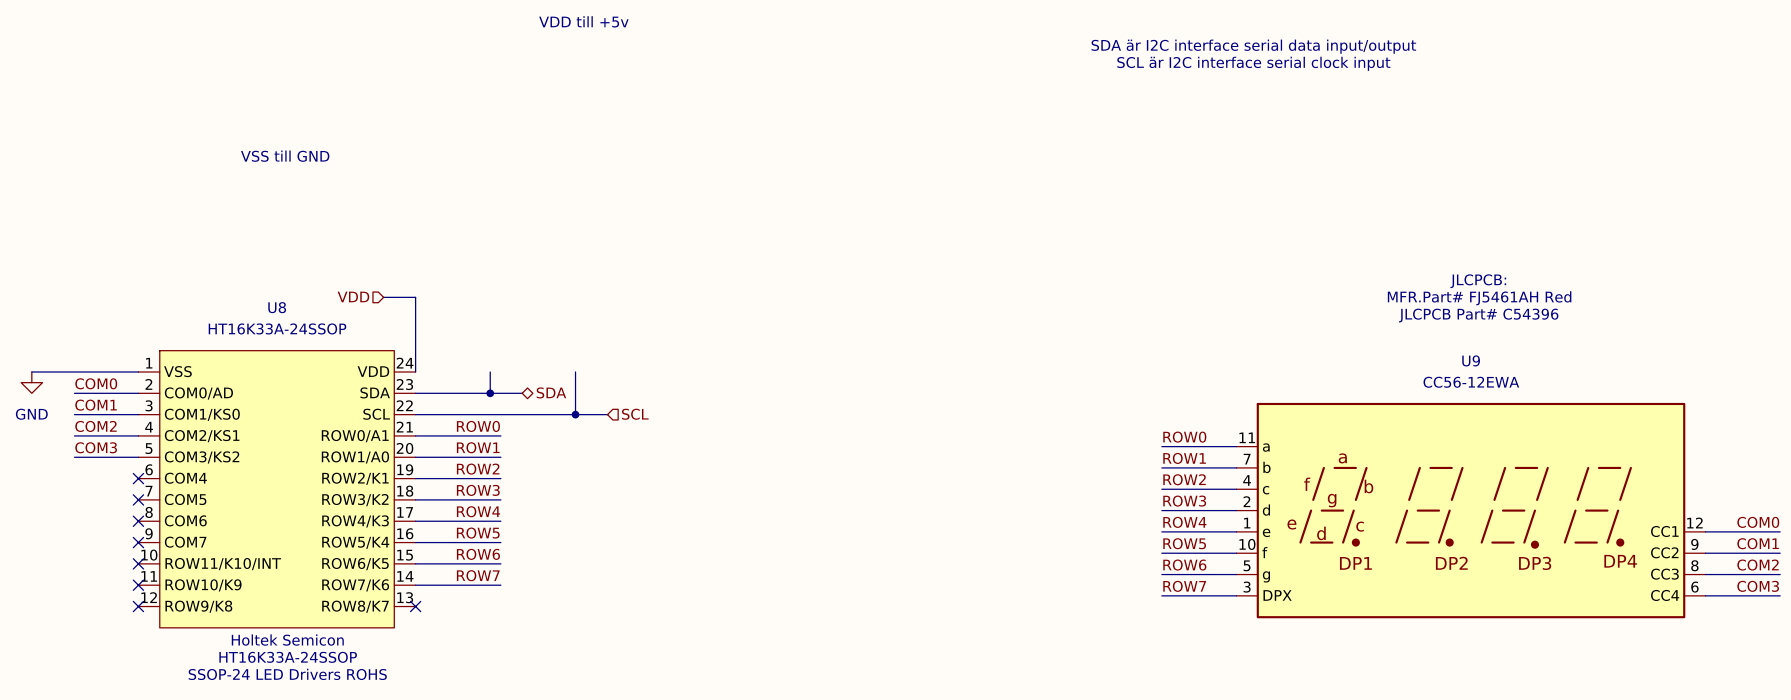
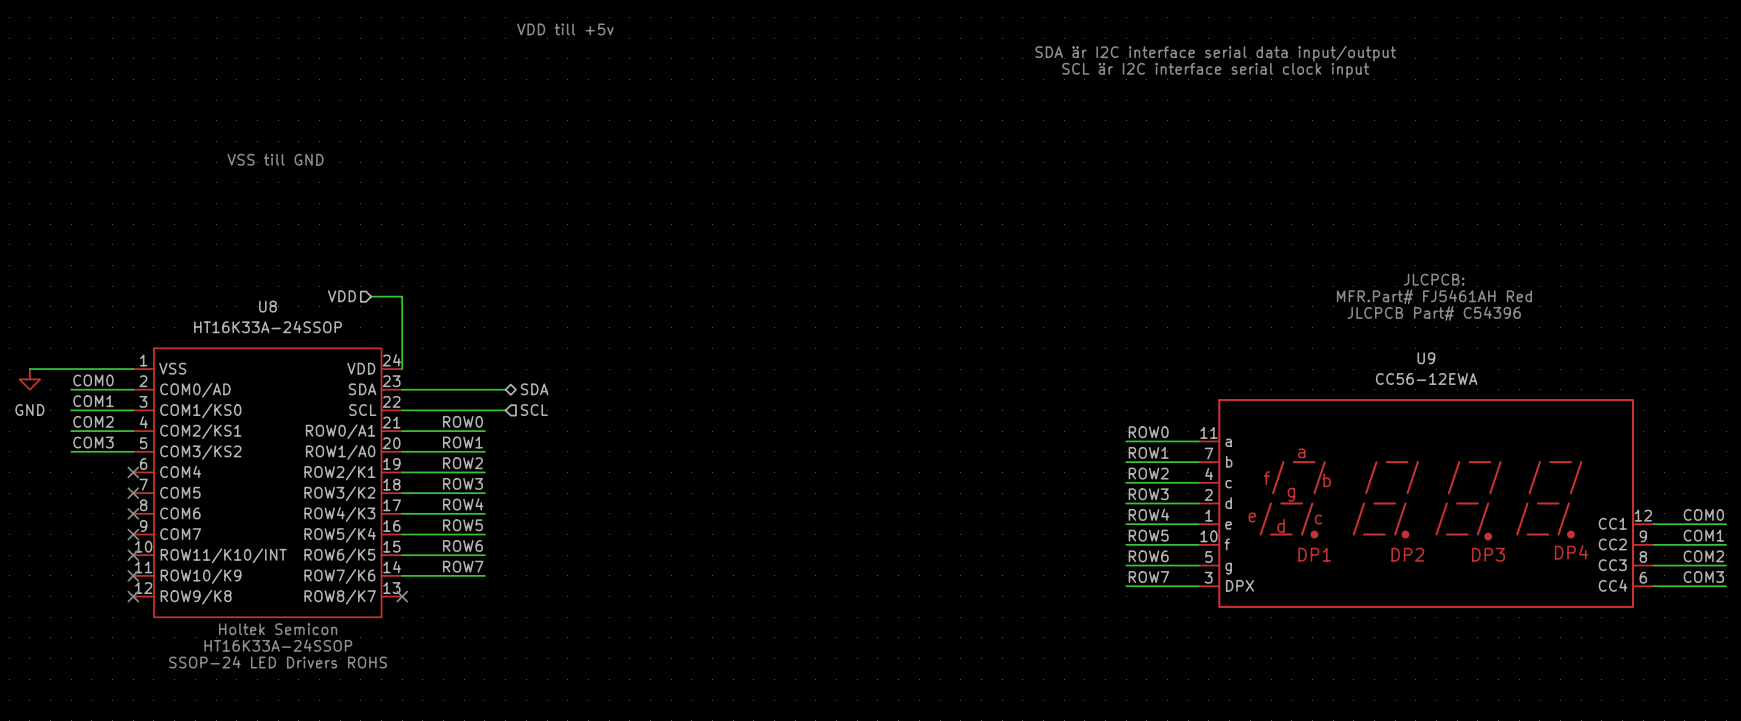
wire: (490, 371) (490, 393) -> none
wire: (575, 371) (575, 414) -> none
junction: (490, 393) -> none
wire: (522, 414) (607, 414) -> none
junction: (575, 414) -> none
hierarchical label position: SCL (635, 414) -> SCL (534, 410)

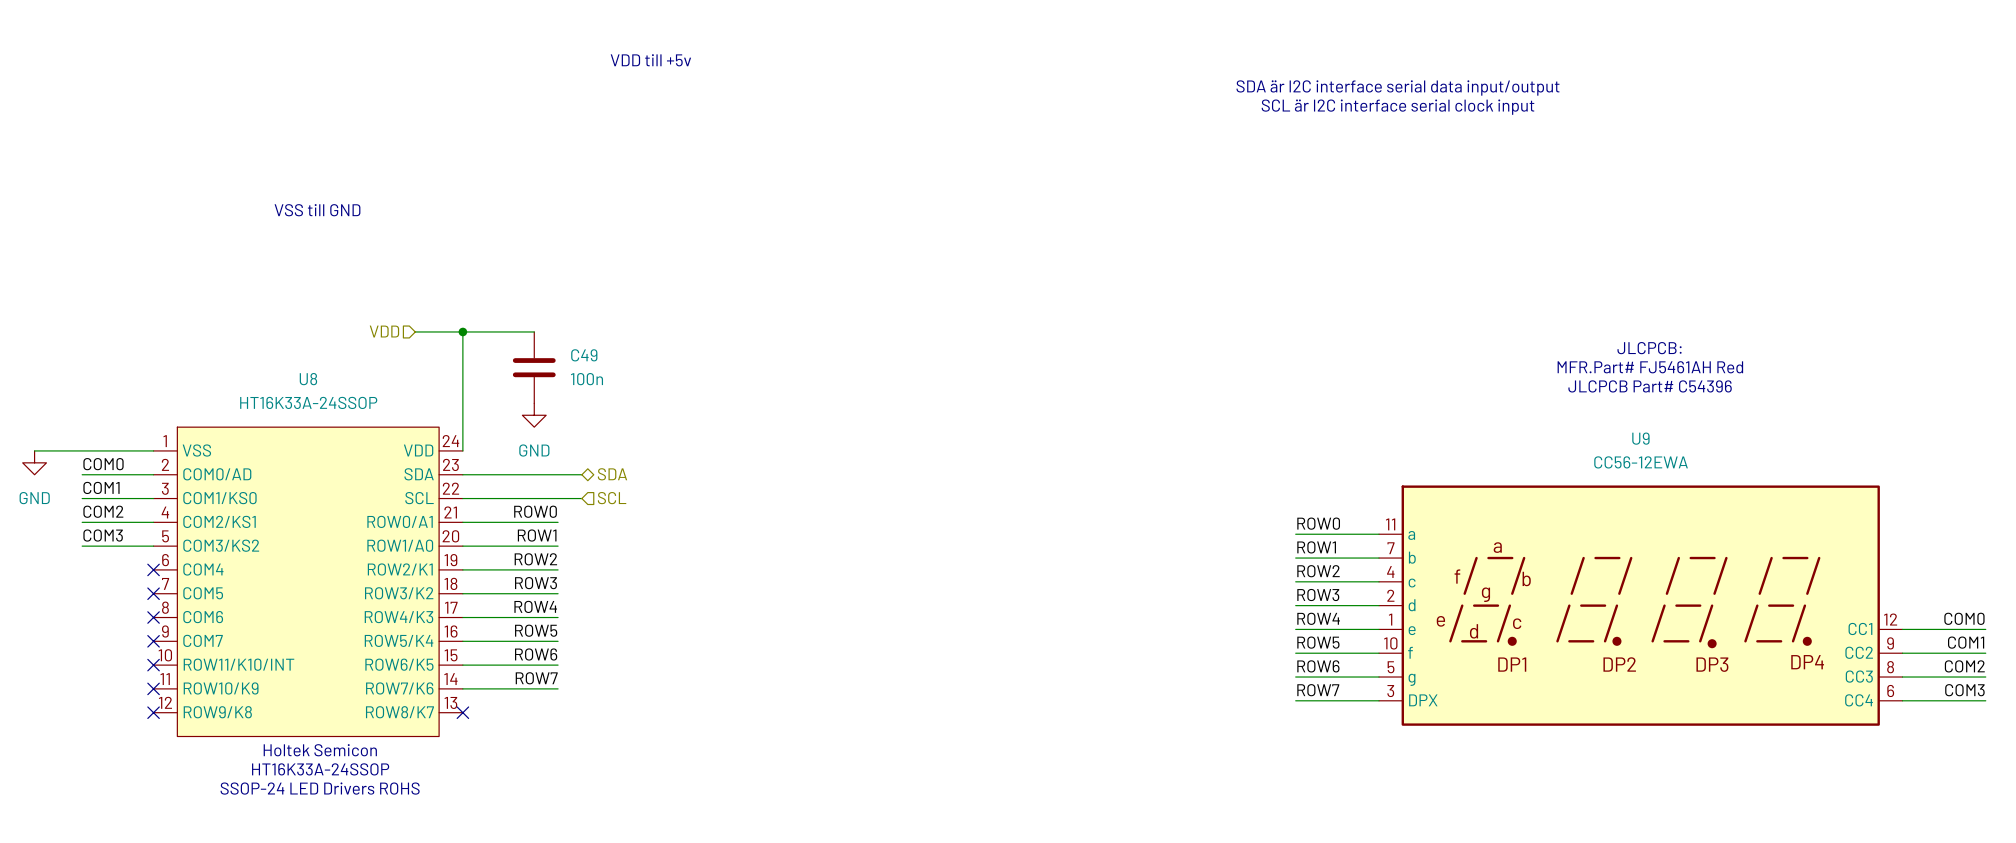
wire: none -> (415, 331) (534, 331)
junction: none -> (462, 331)
hierarchical label position: VDD (341, 296) -> VDD (384, 331)
wire: (371, 296) (402, 296) -> (462, 331) (462, 367)
C49: none -> 100n (534, 367)
power symbol: none -> GND (534, 415)

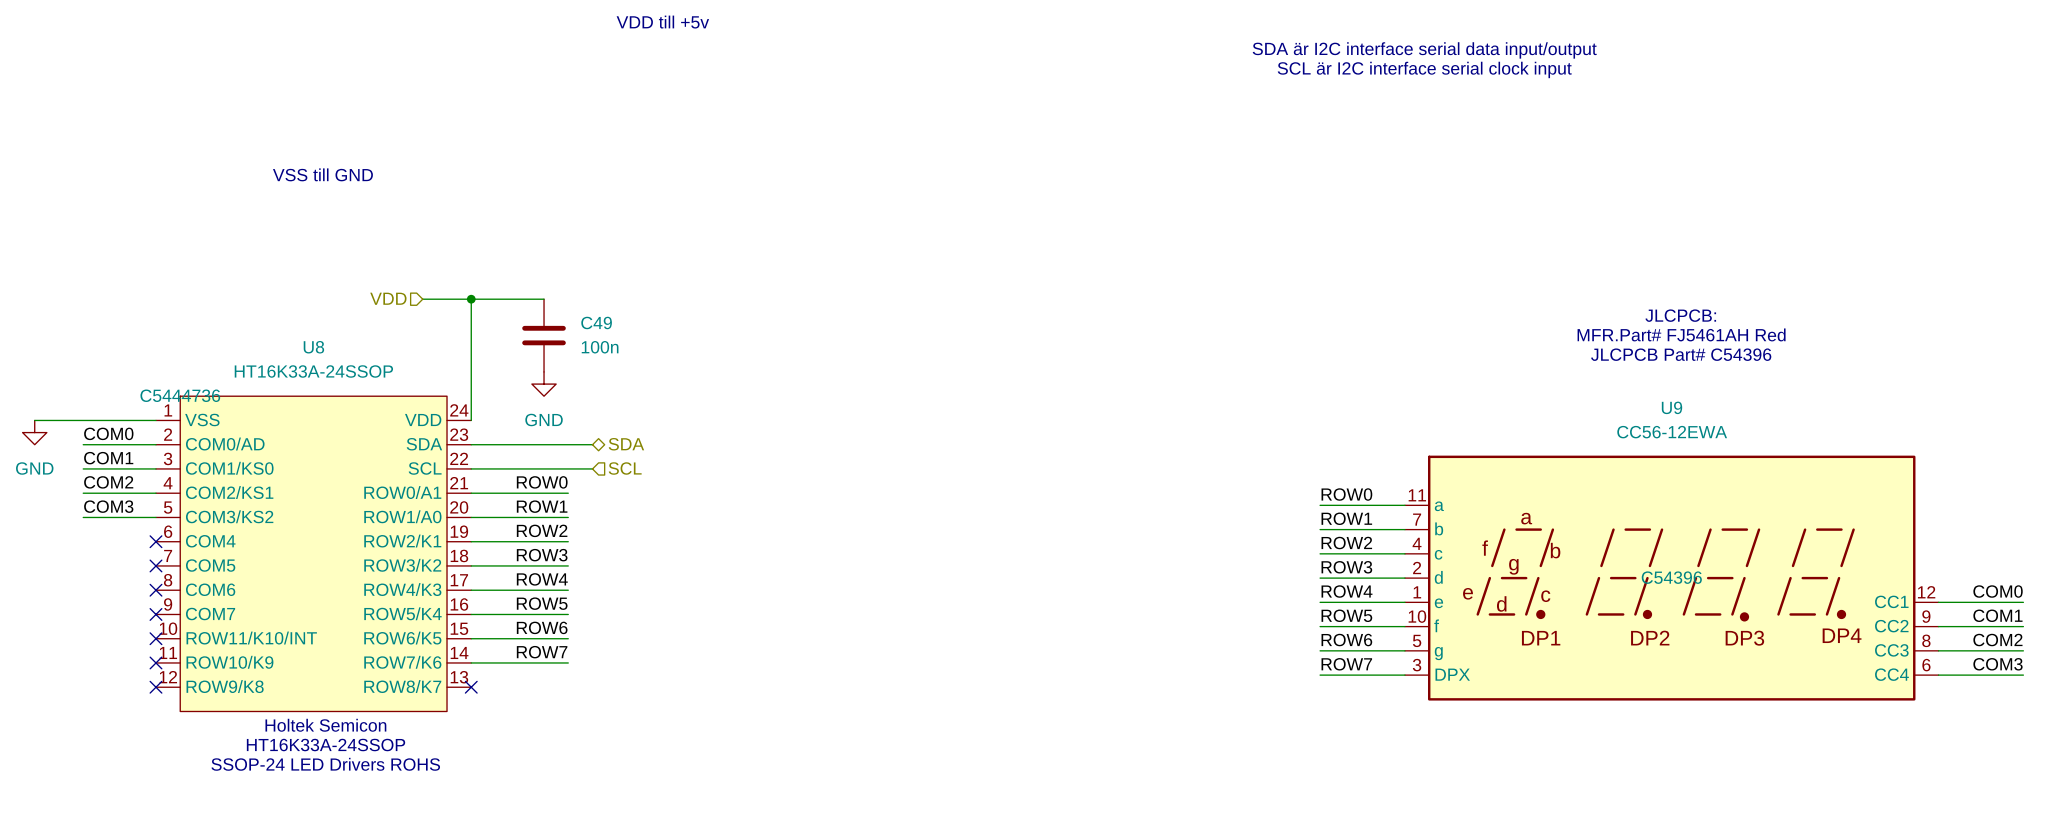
U8 text: none -> C5444736 (180, 395)
U9 text: none -> C54396 (1671, 577)

